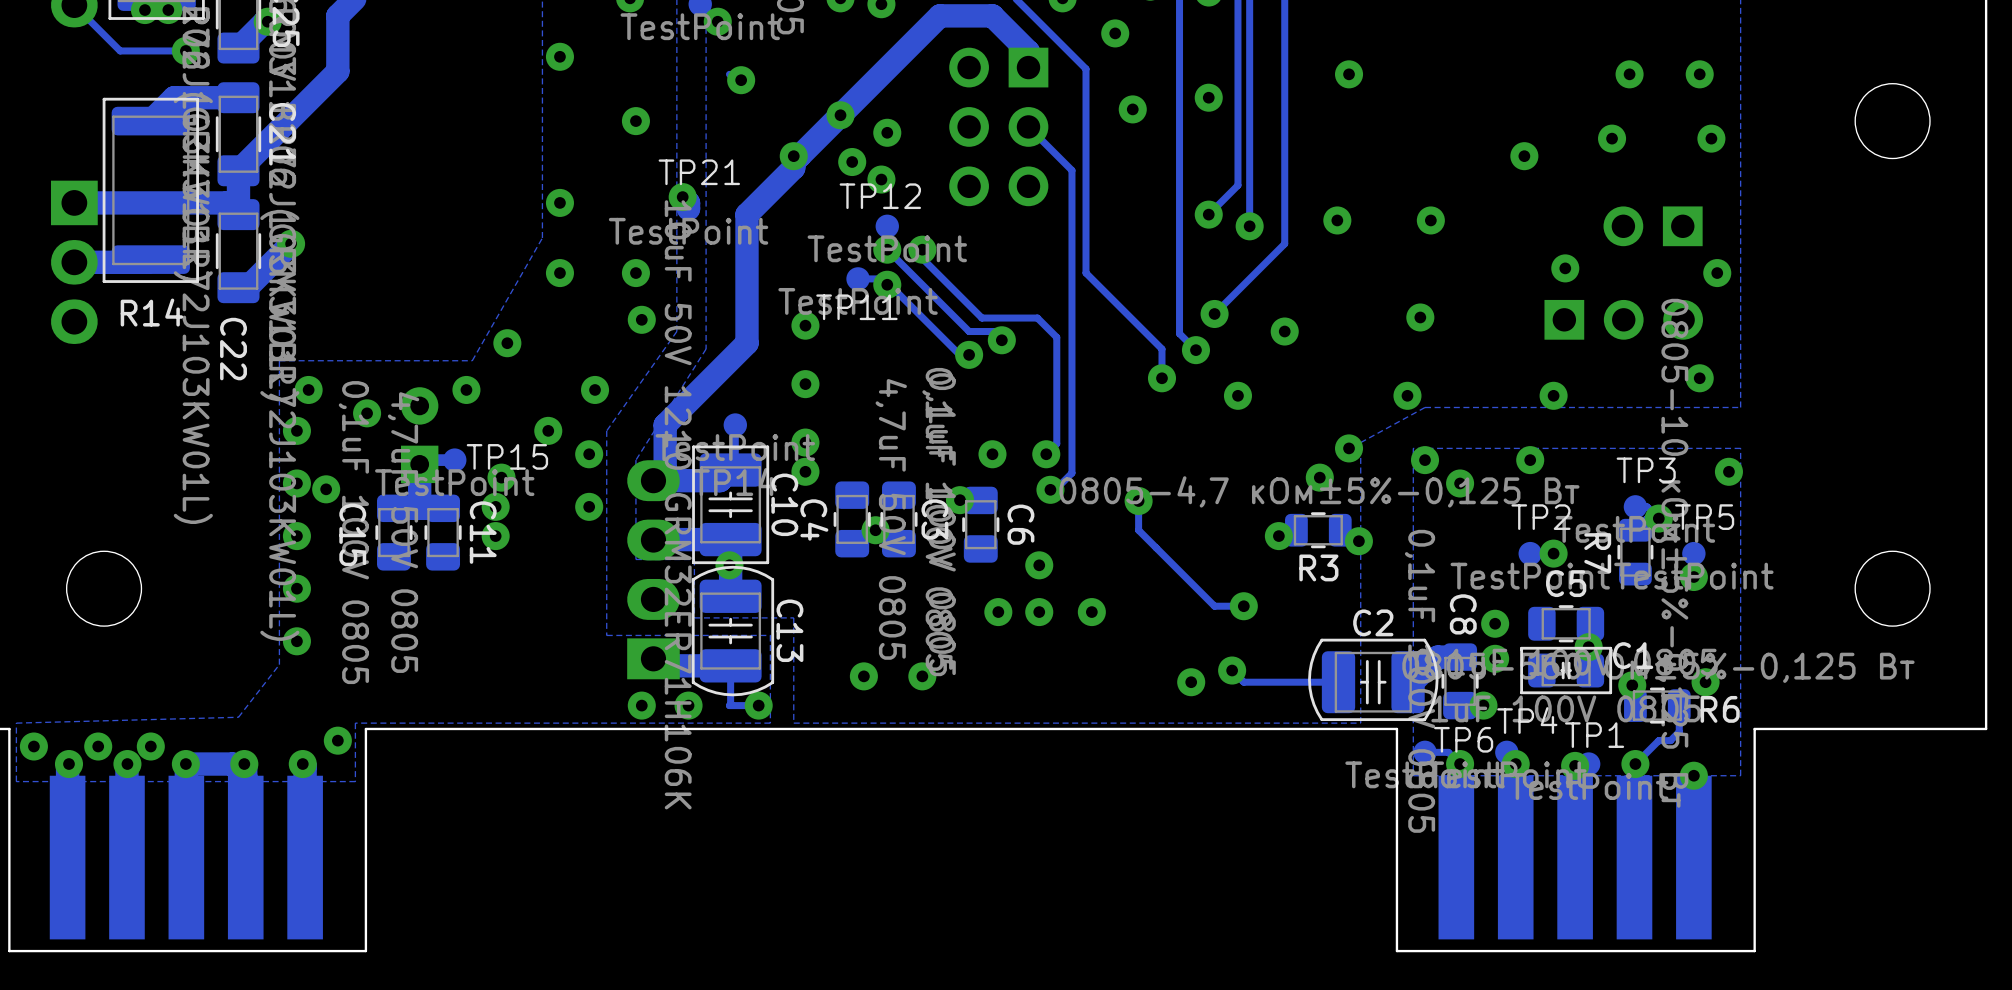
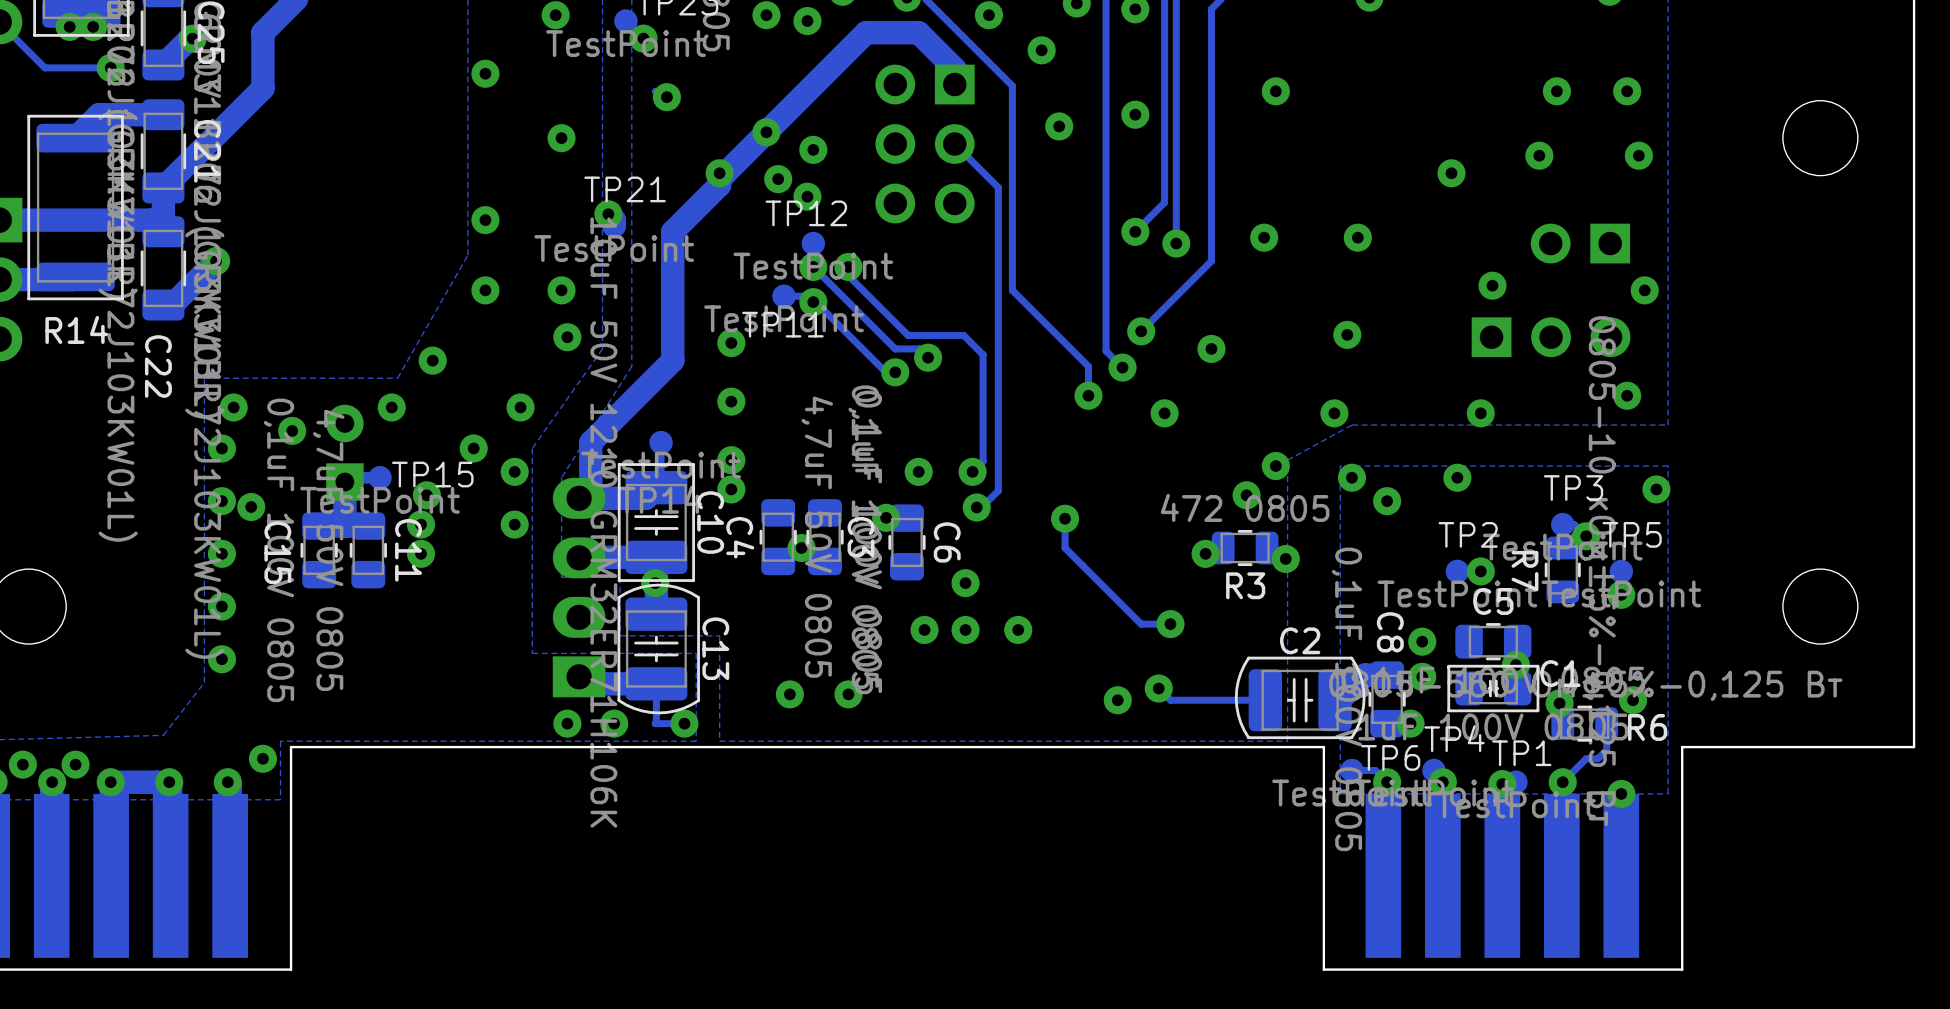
R3 value: 0805-4,7 кОм±5%-0,125 Вт (1319, 491) -> 472 0805 (1245, 507)

